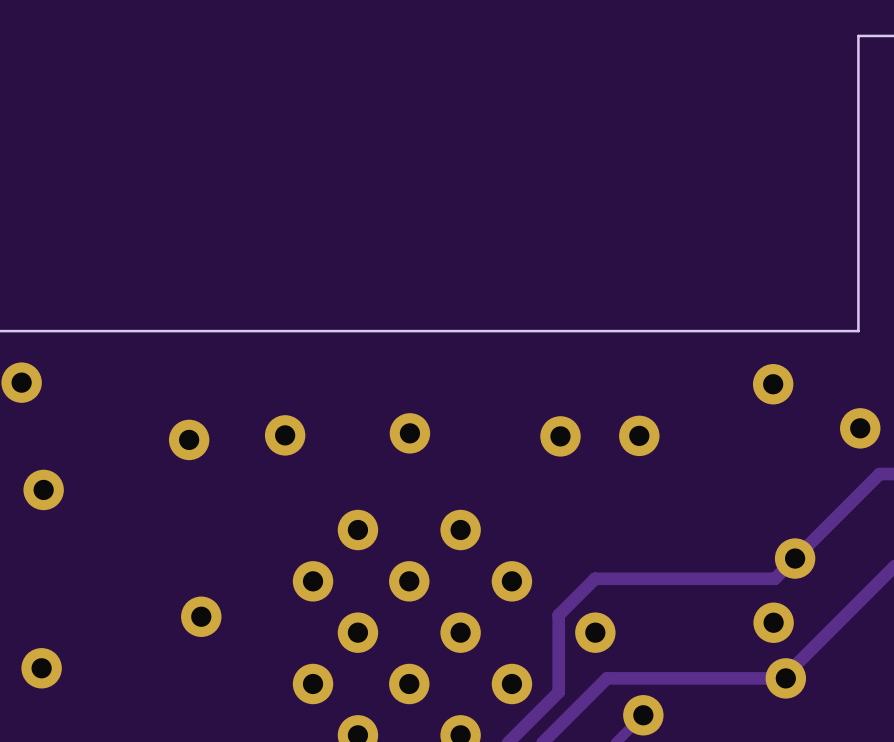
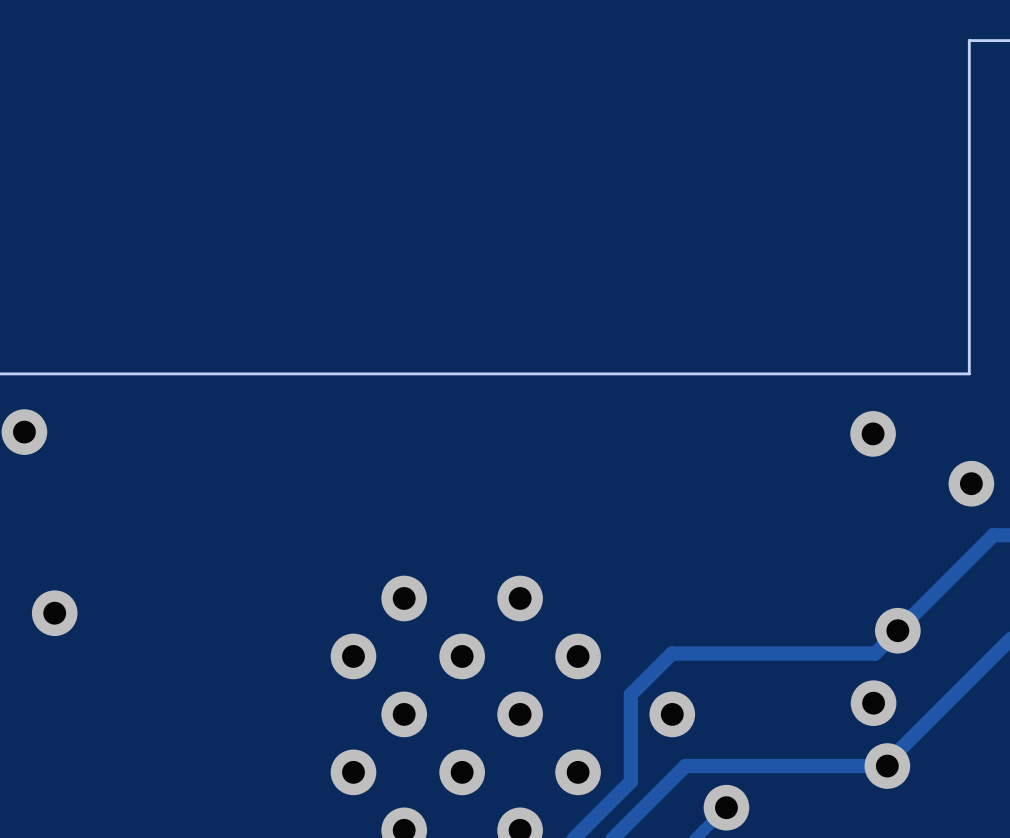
via: (409, 433) -> none
via: (285, 435) -> none
via: (639, 435) -> none
via: (560, 436) -> none
via: (189, 439) -> none
via position: (43, 489) -> (54, 613)
via: (201, 616) -> none
via: (41, 668) -> none

